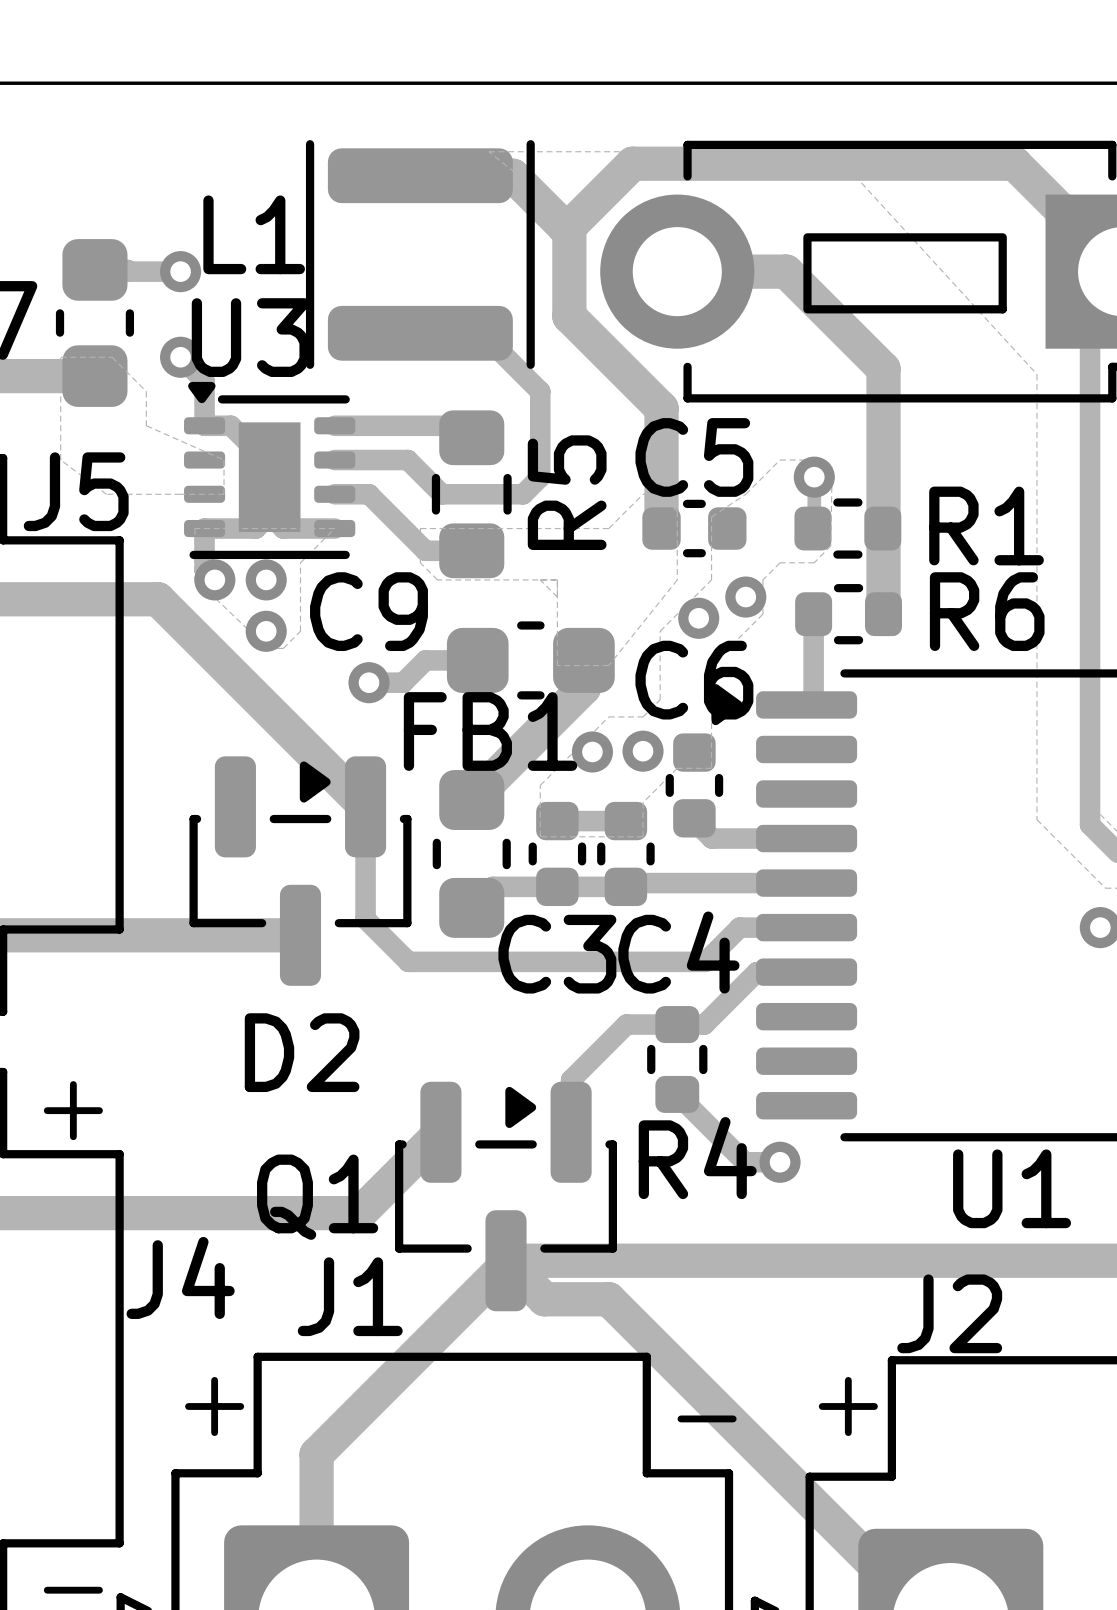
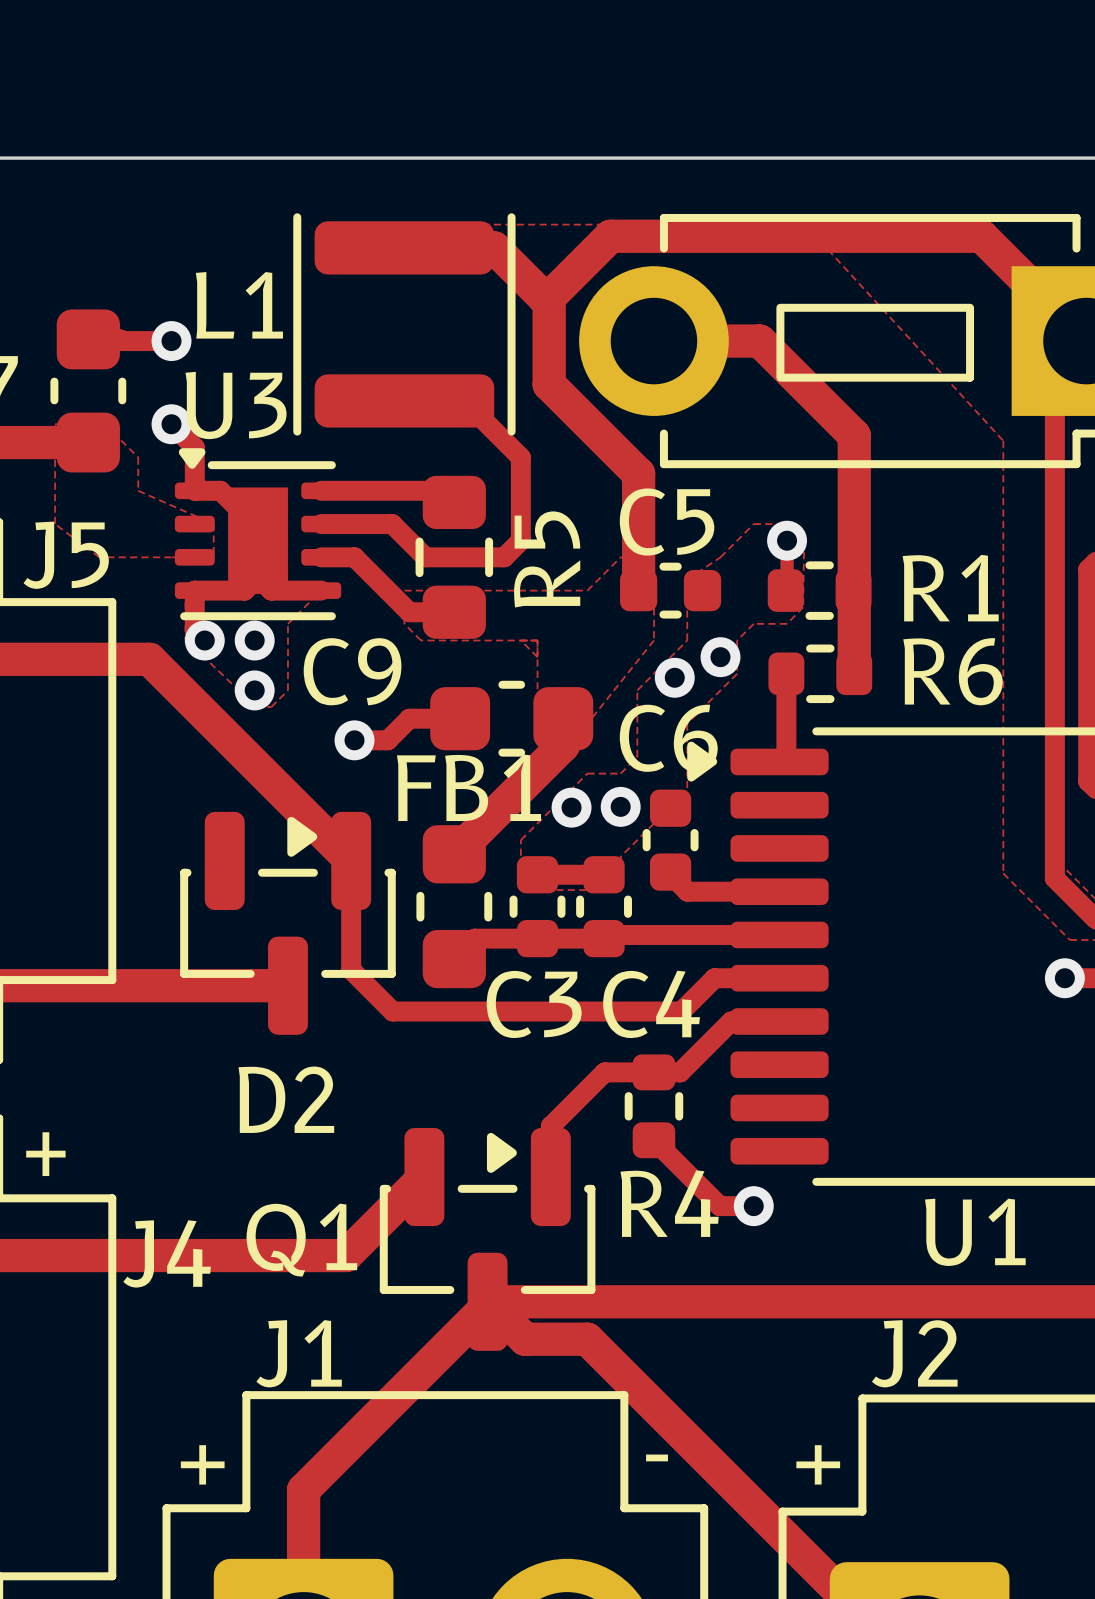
J4 name position: J4 (180, 1277) -> J4 (167, 1253)
J1 name position: J1 (350, 1296) -> J1 (299, 1353)

